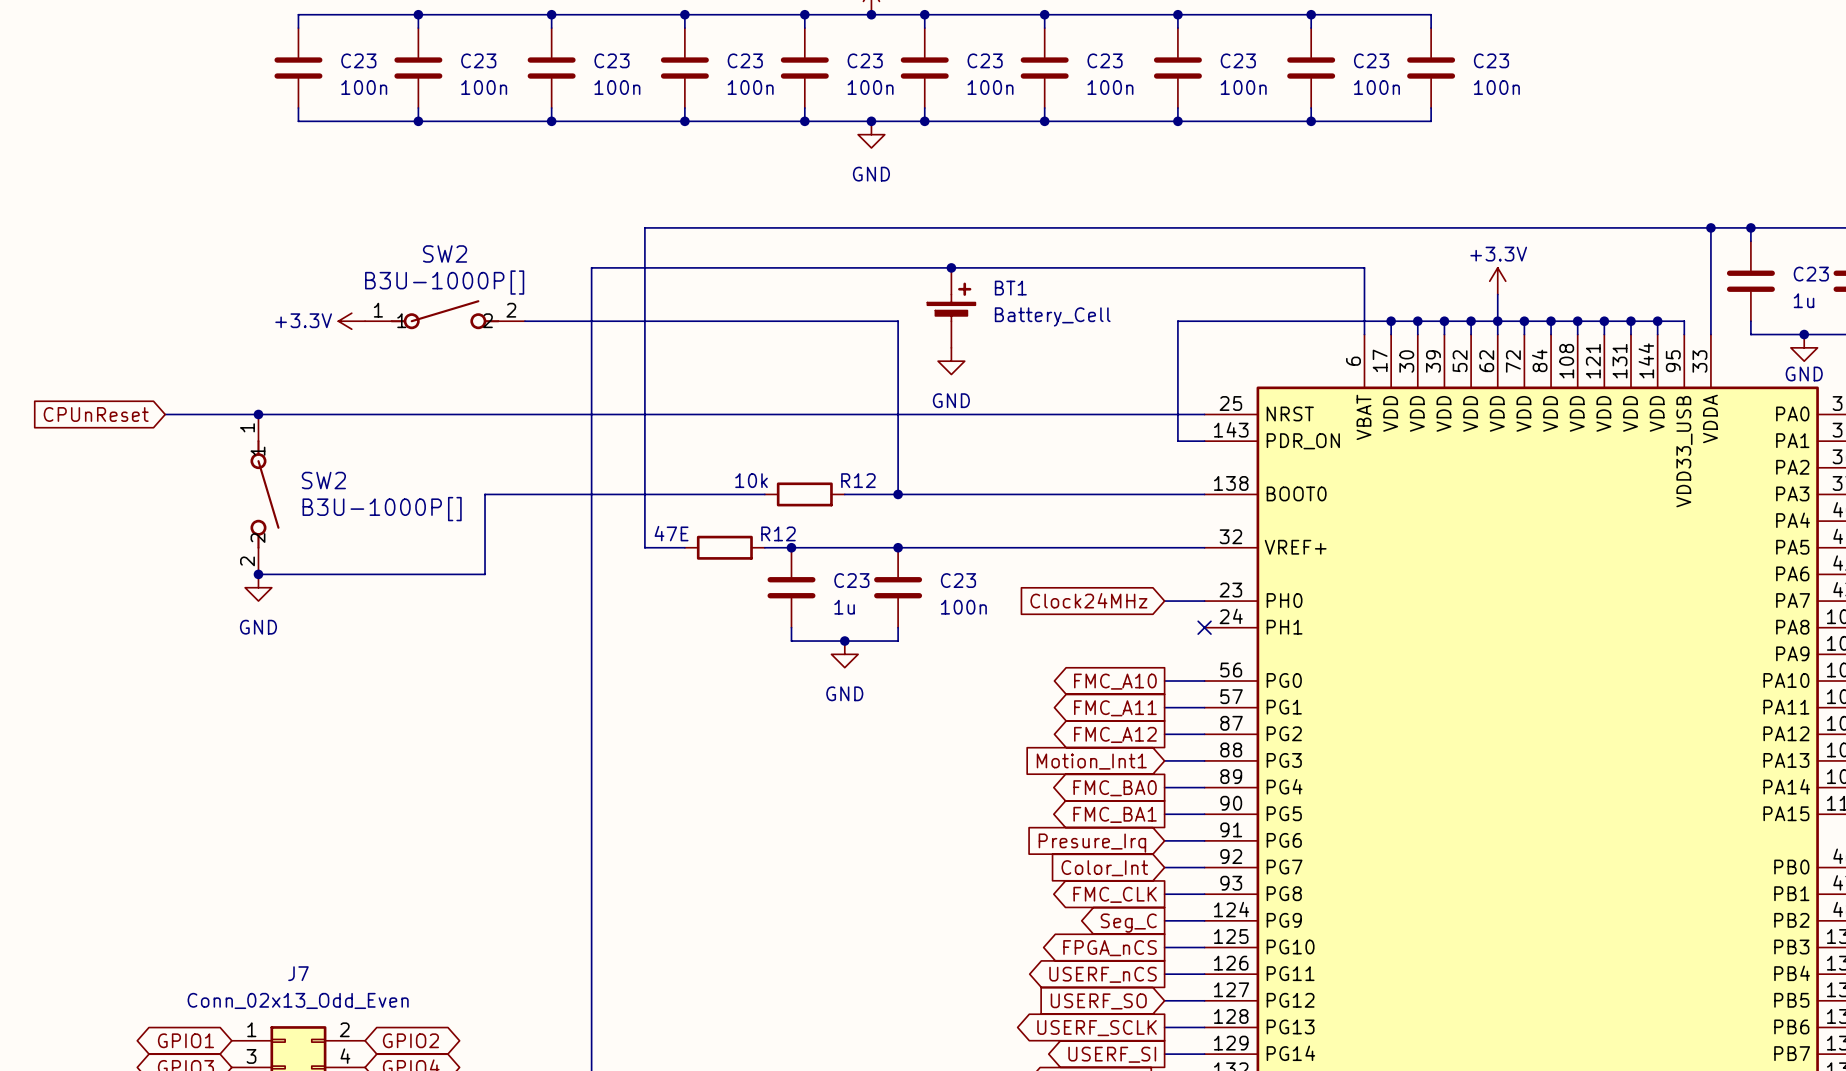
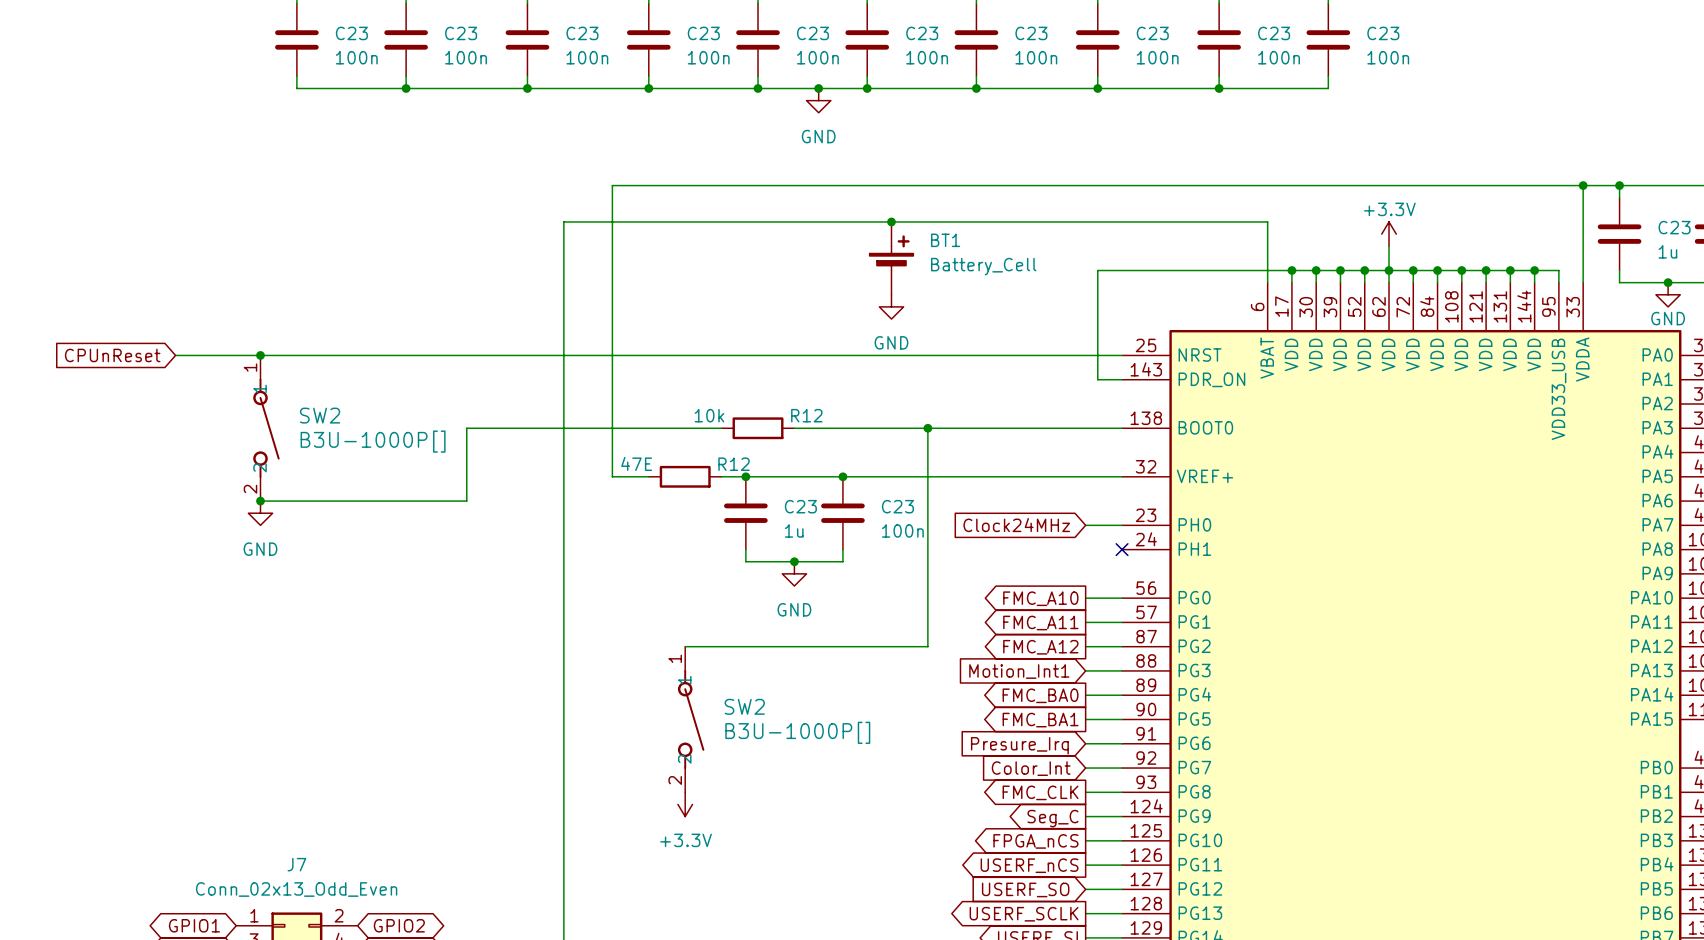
SW2: B3U-1000P[] (445, 314) -> none
power symbol: +3.3V (351, 321) -> none
wire: (524, 321) (898, 321) (898, 494) -> none
junction: (898, 494) -> none
wire: none -> (927, 428) (927, 646) (685, 646)
junction: none -> (927, 428)
SW2: none -> B3U-1000P[] (691, 719)
power symbol: none -> +3.3V (685, 804)

